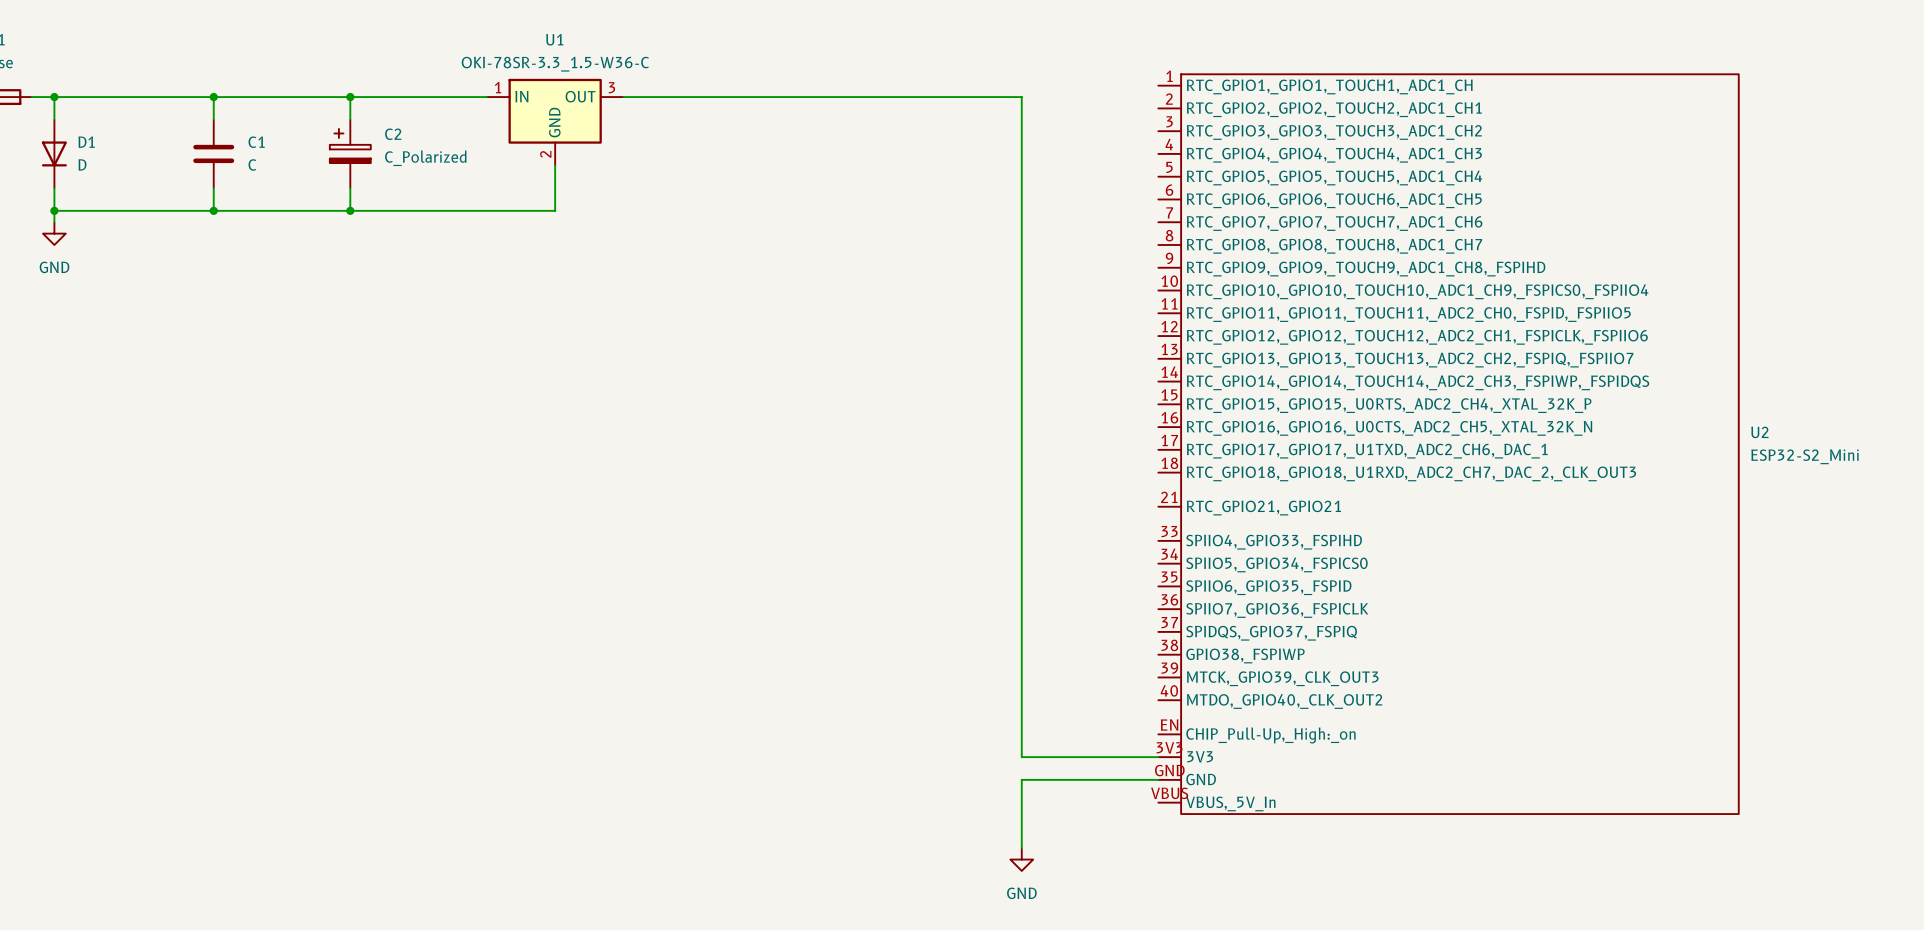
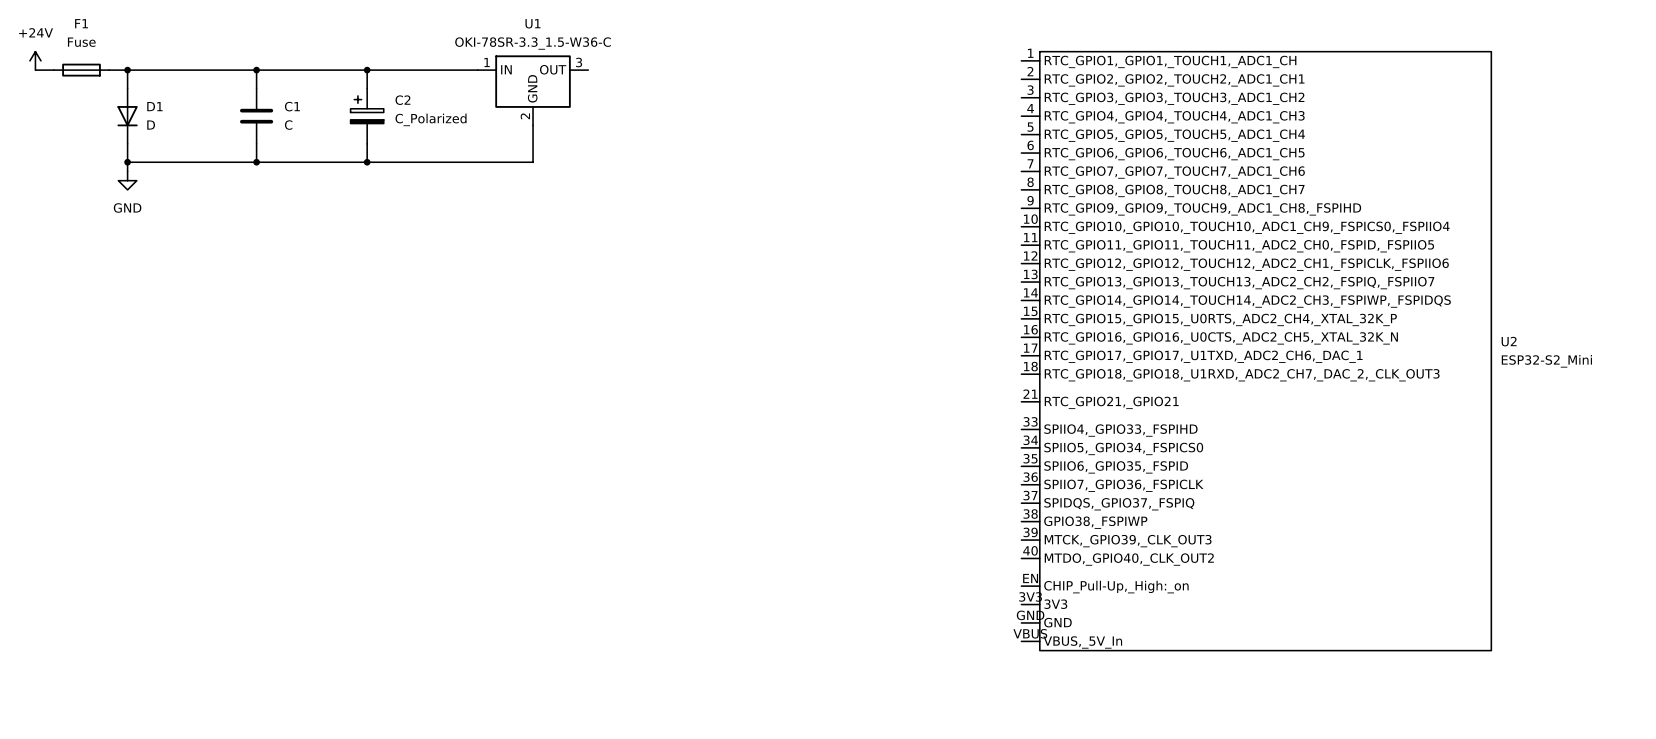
wire: (623, 97) (1021, 97) (1021, 757) (1158, 757) -> none
wire: (1158, 779) (1021, 779) (1021, 848) -> none
power symbol: GND (1021, 859) -> none

